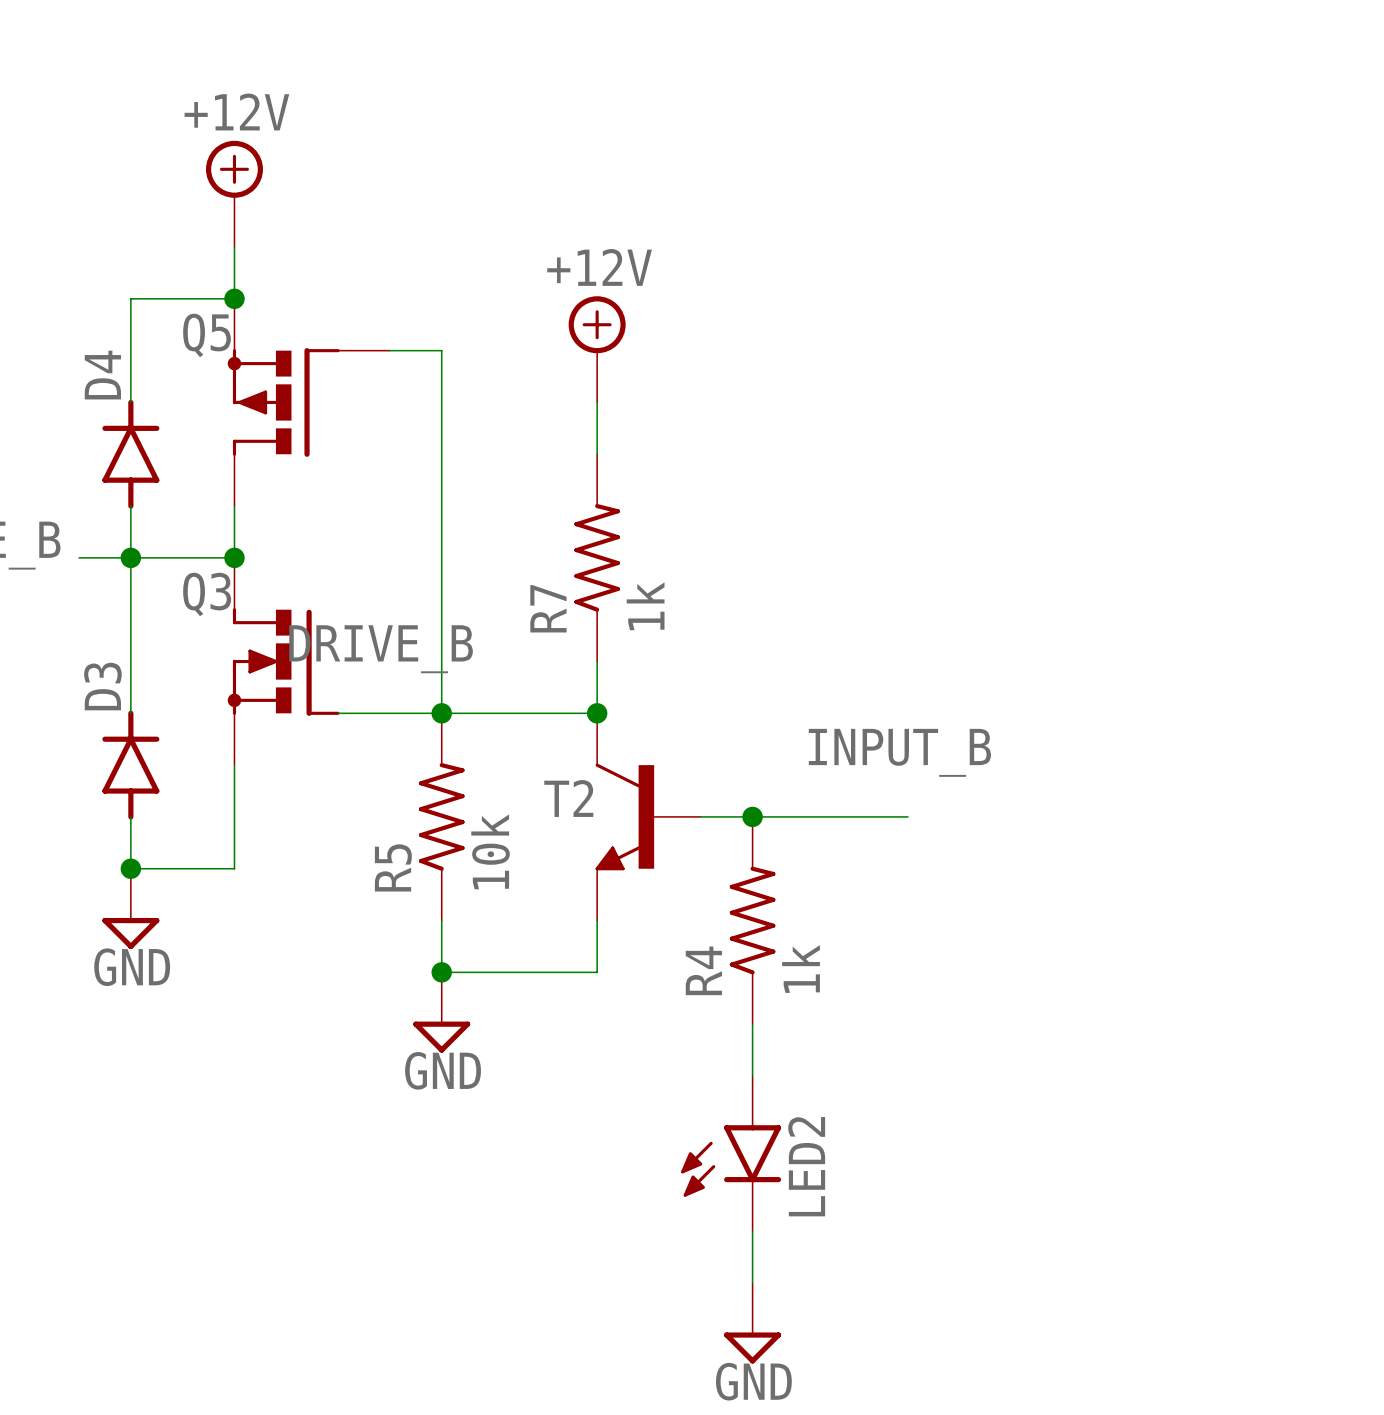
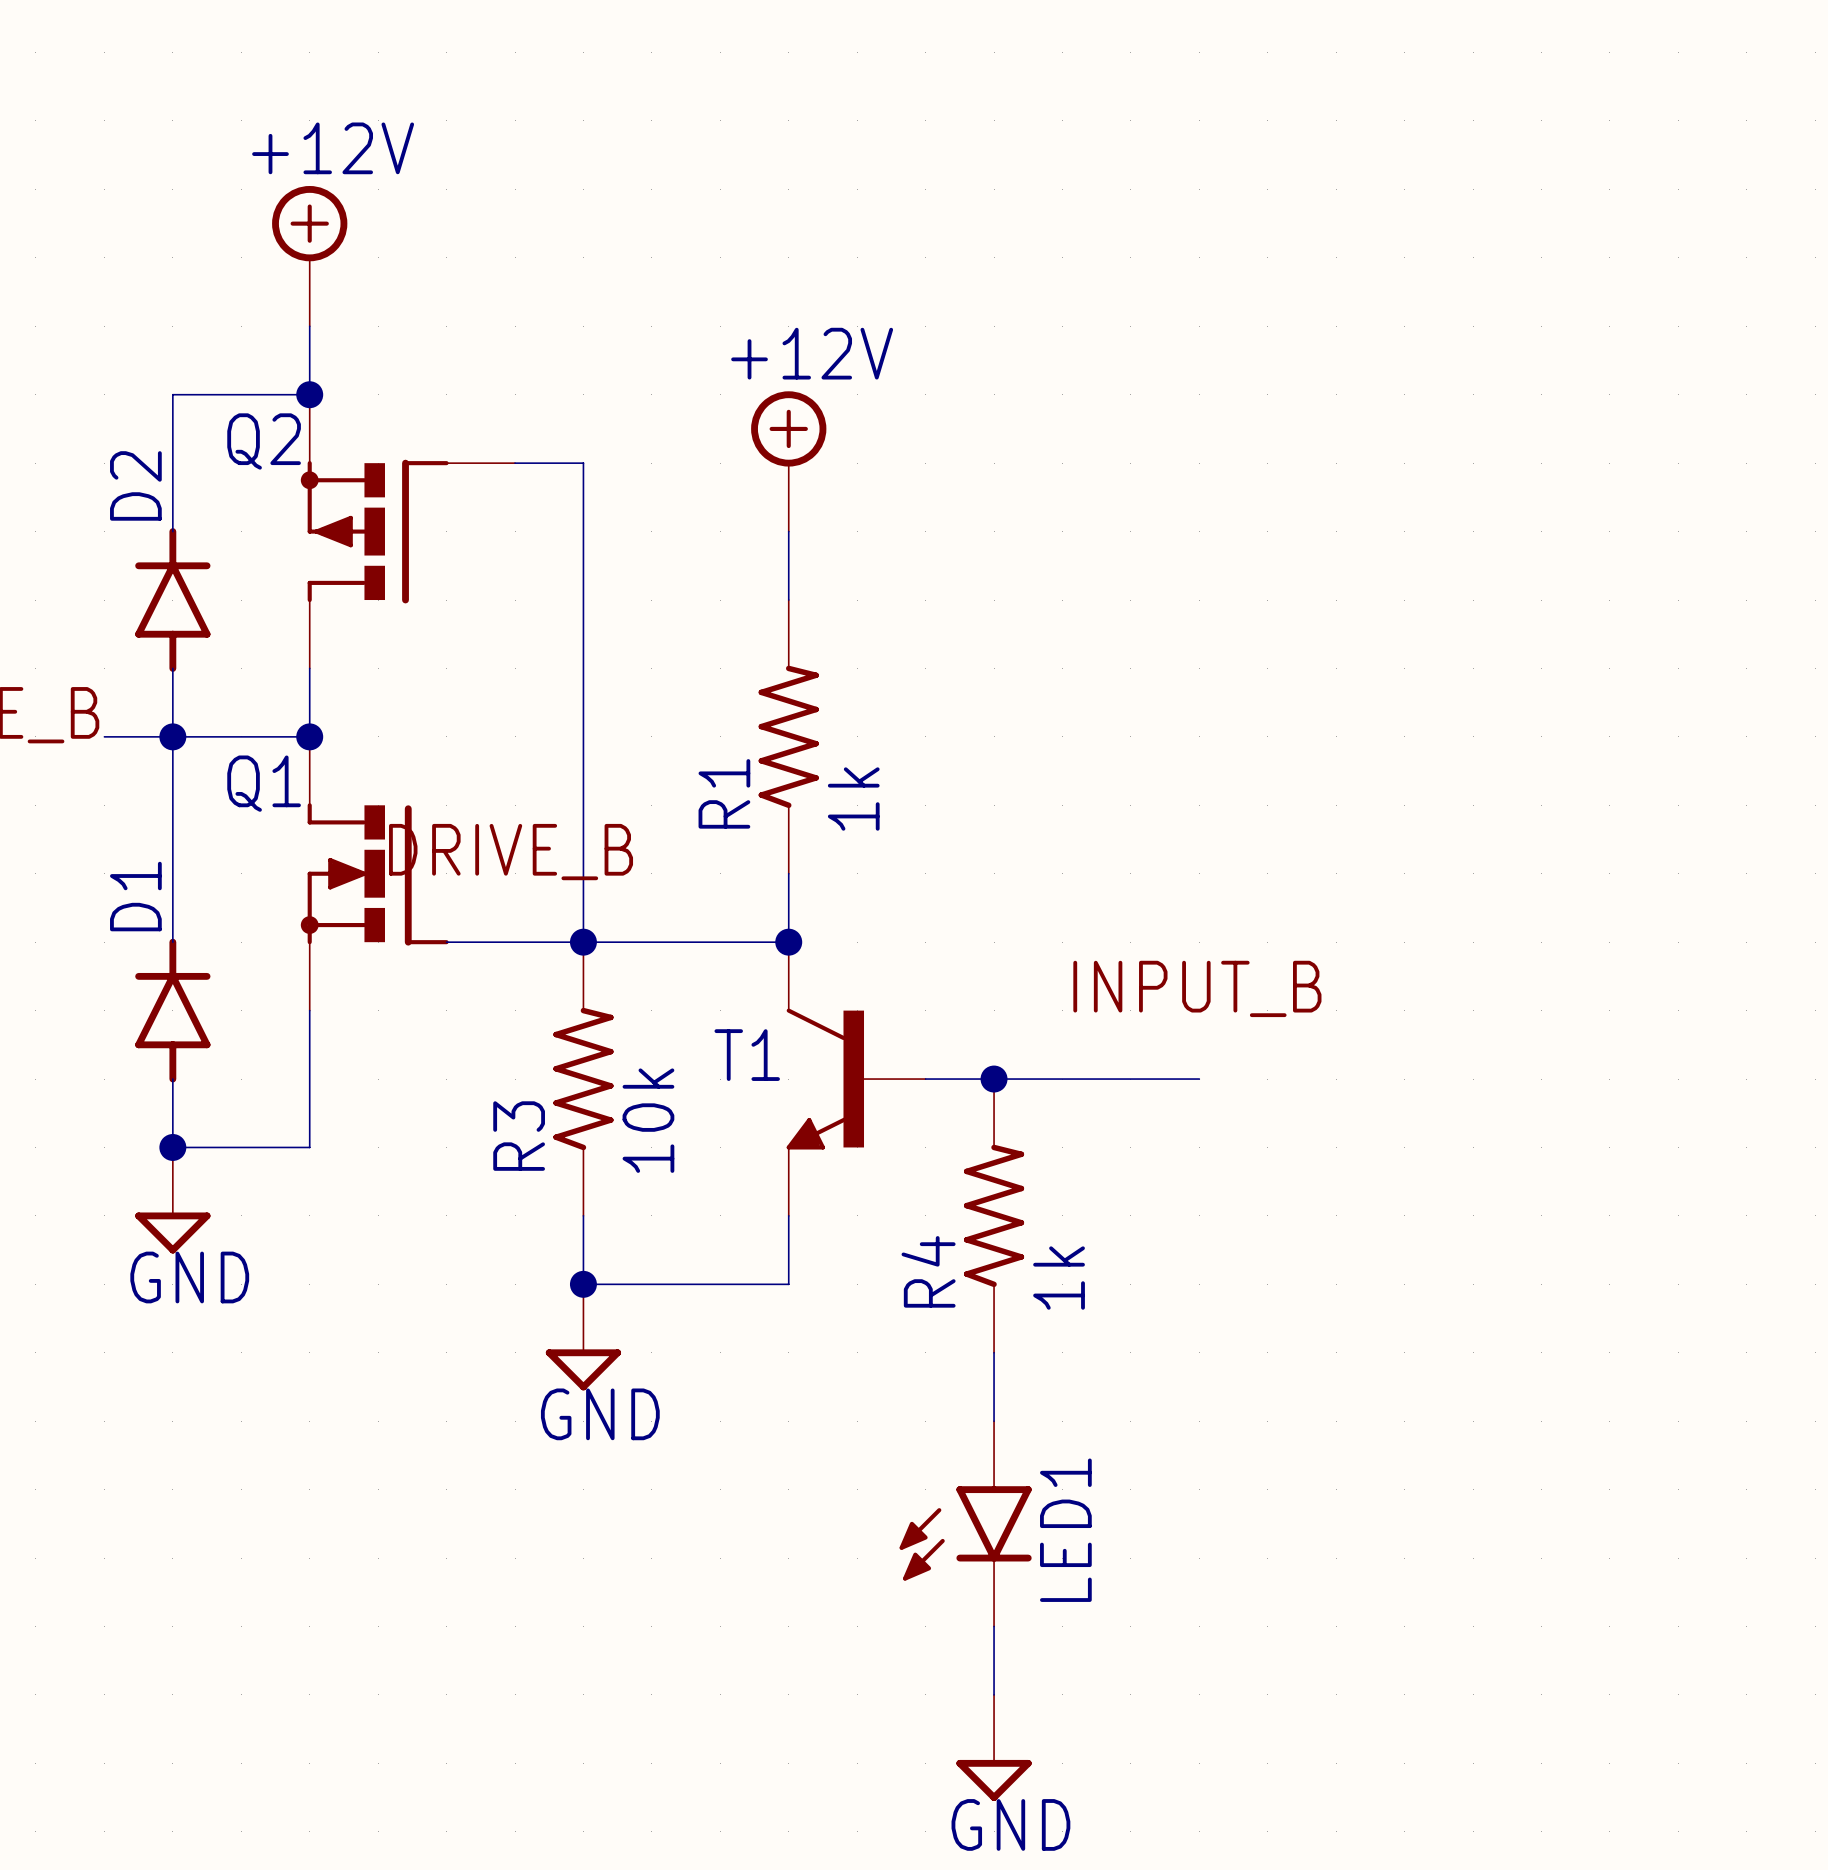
Q5 name: Q5 (207, 335) -> Q2 (264, 441)
D4 name: D4 (102, 375) -> D2 (135, 485)
Q3 name: Q3 (207, 594) -> Q1 (264, 783)
R7 name: R7 (548, 608) -> R1 (724, 793)
D3 name: D3 (102, 686) -> D1 (135, 896)
T2 name: T2 (568, 798) -> T1 (747, 1055)
R5 name: R5 (393, 867) -> R3 (519, 1136)
LED2 name: LED2 (806, 1166) -> LED1 (1065, 1530)

